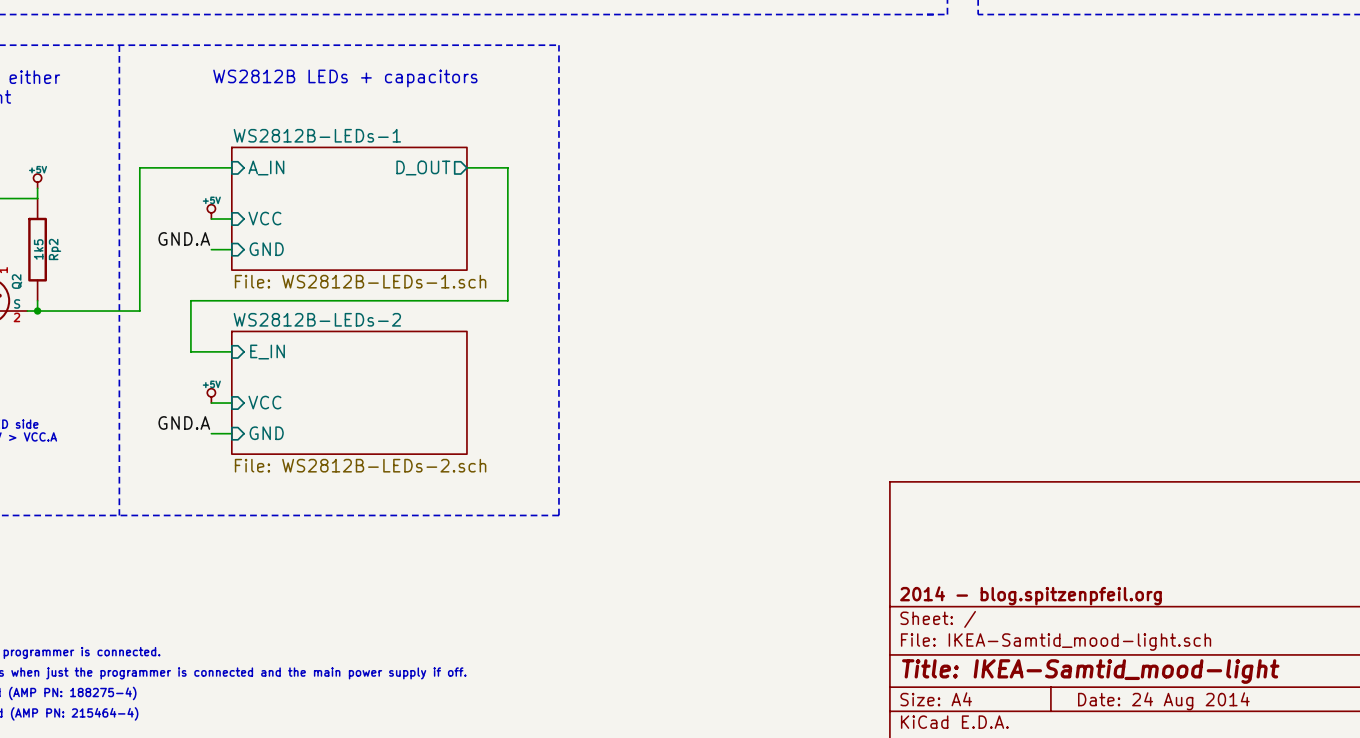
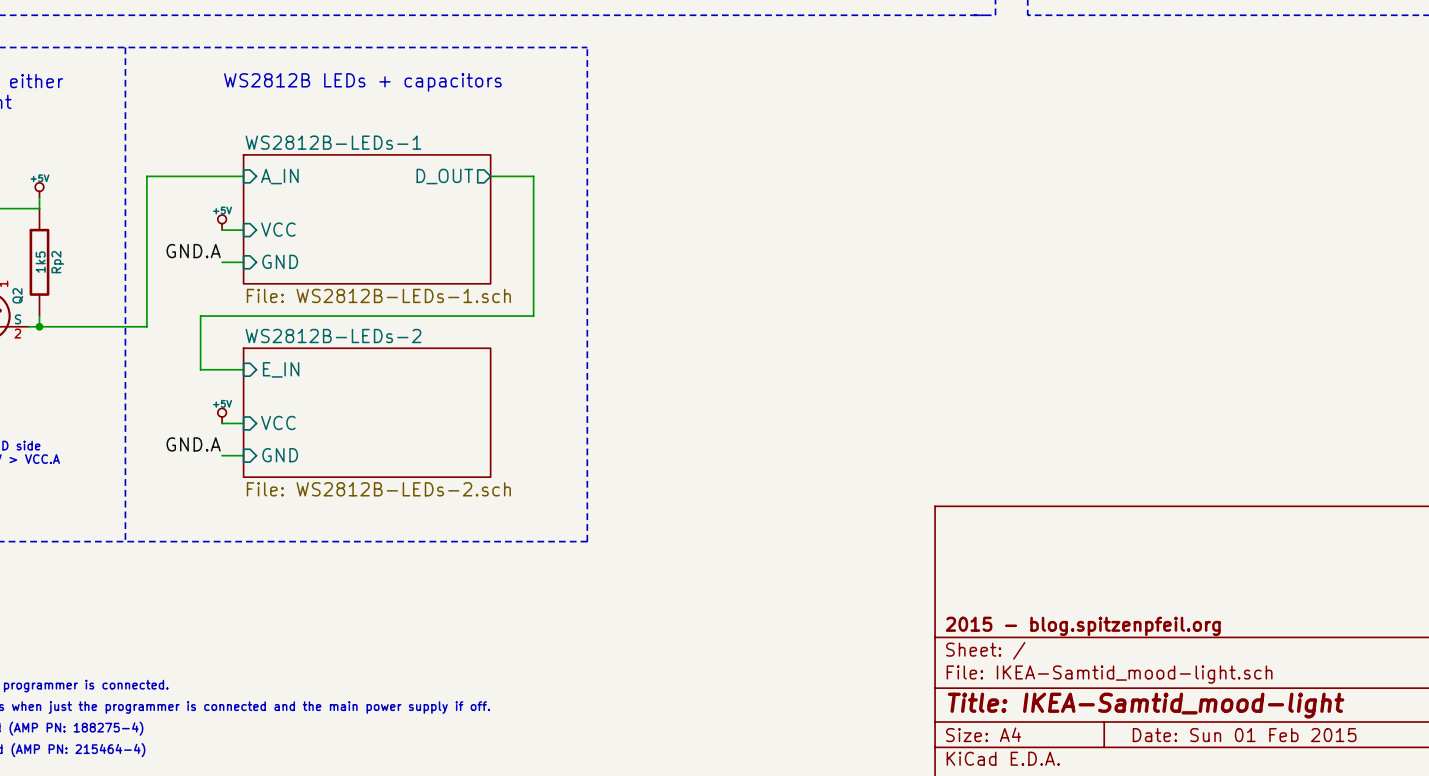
title block: 2014 - blog.spitzenpfeil.org (1030, 595) -> 2015 - blog.spitzenpfeil.org (1083, 626)
title block: Date: 24 Aug 2014 (1163, 701) -> Date: Sun 01 Feb 2015 (1244, 735)

